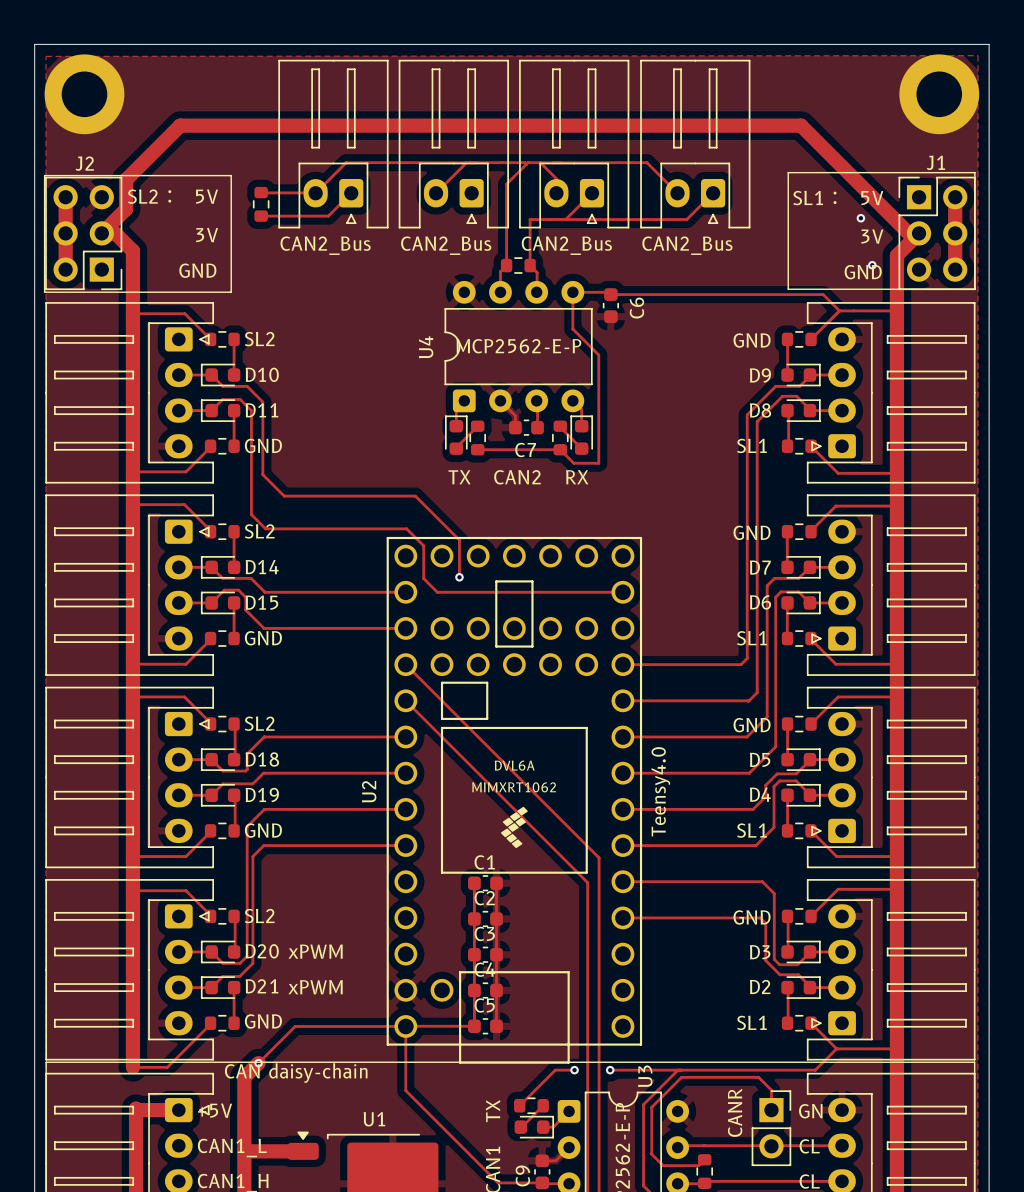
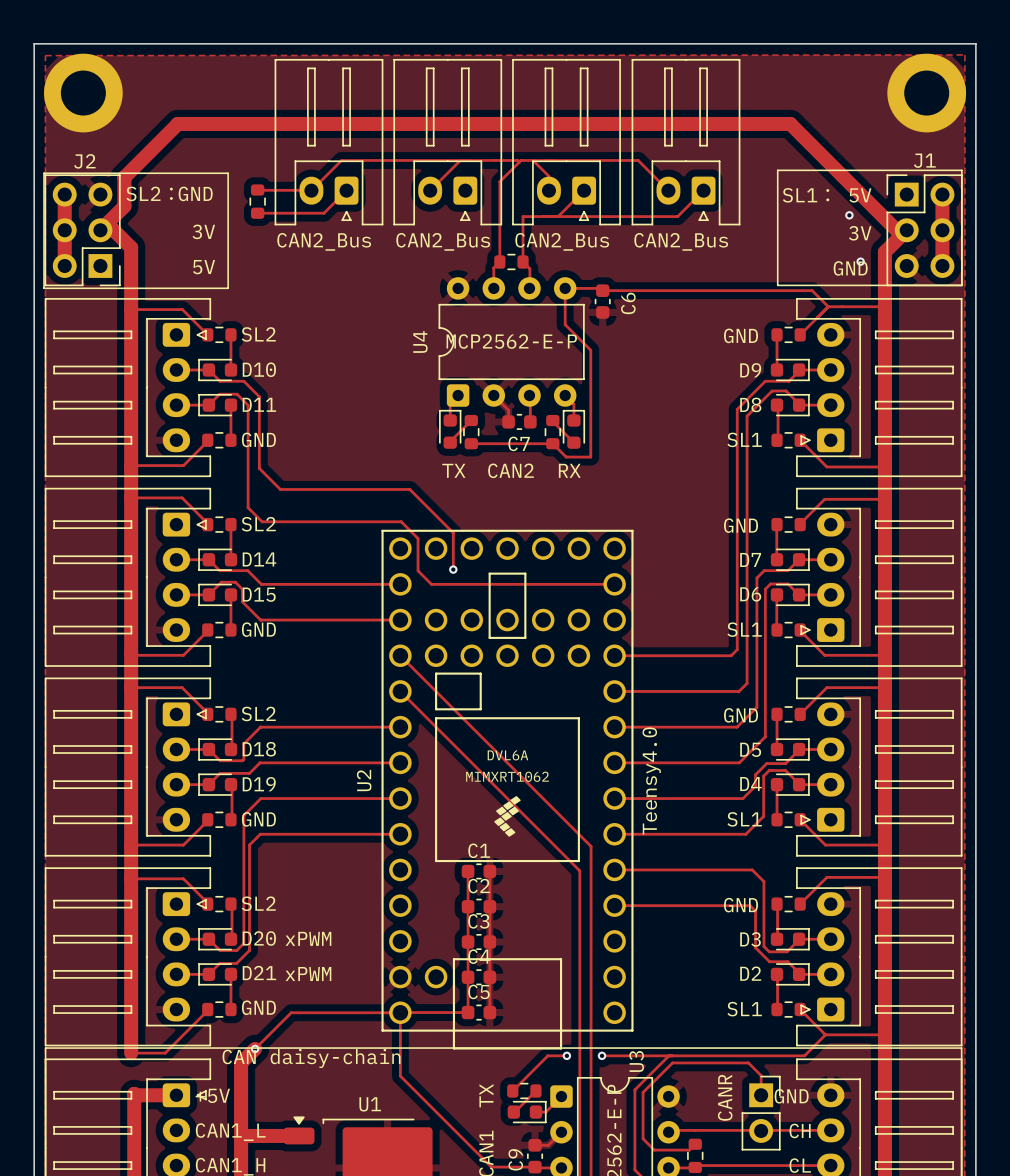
text: 5V (207, 196) -> GND (195, 193)
text: GND (197, 270) -> none
text: none -> 5V (204, 267)
text: GN (810, 1111) -> GND (791, 1096)
text: CL (809, 1146) -> CH (800, 1130)

